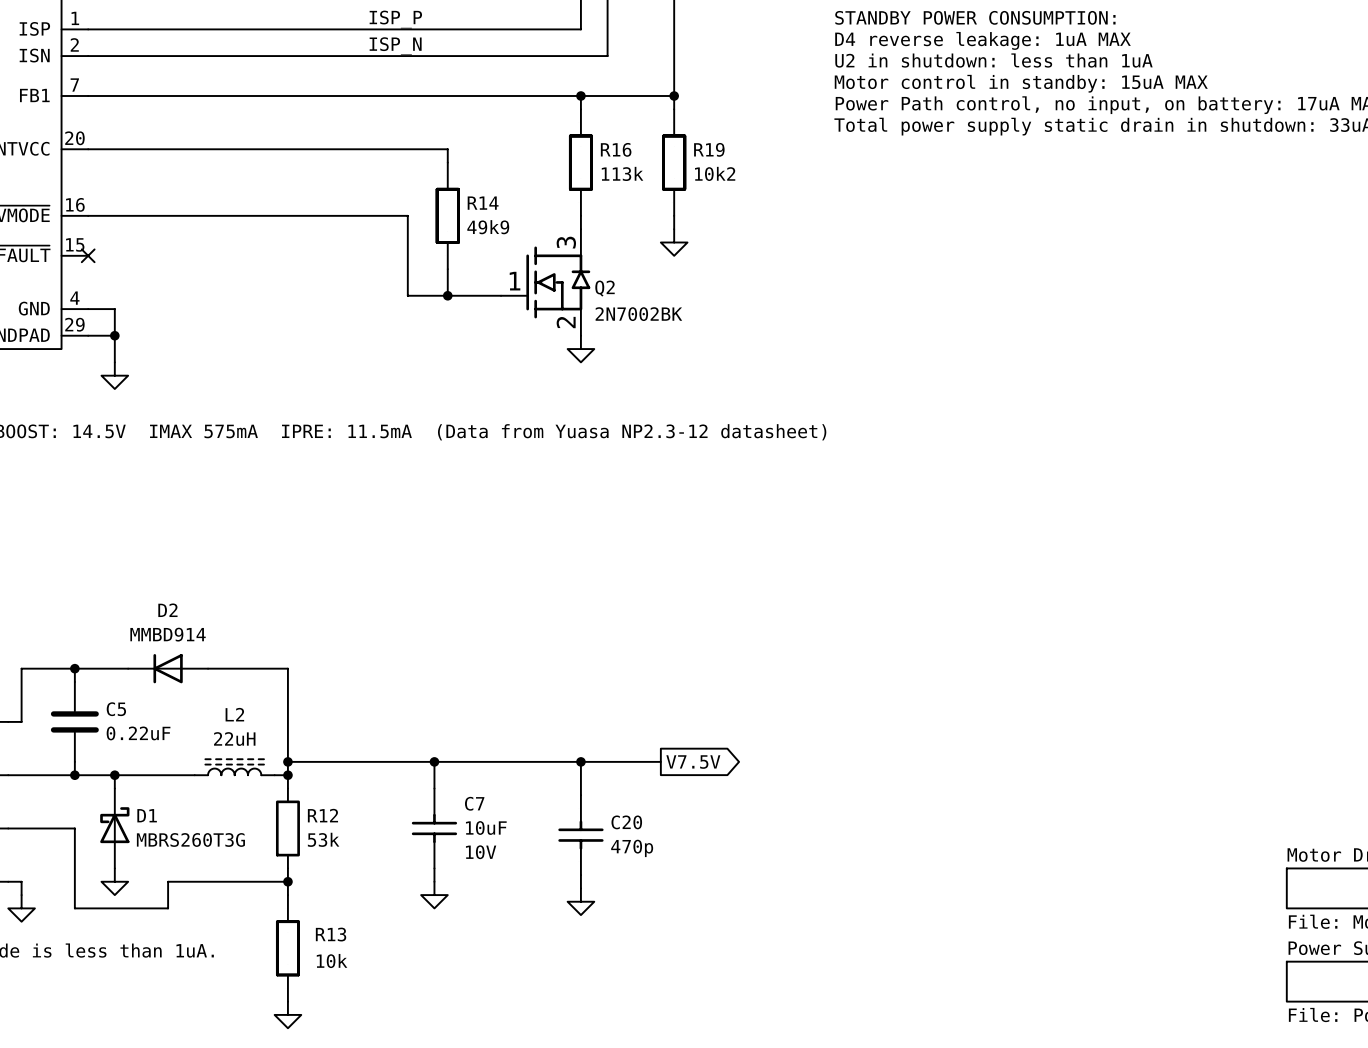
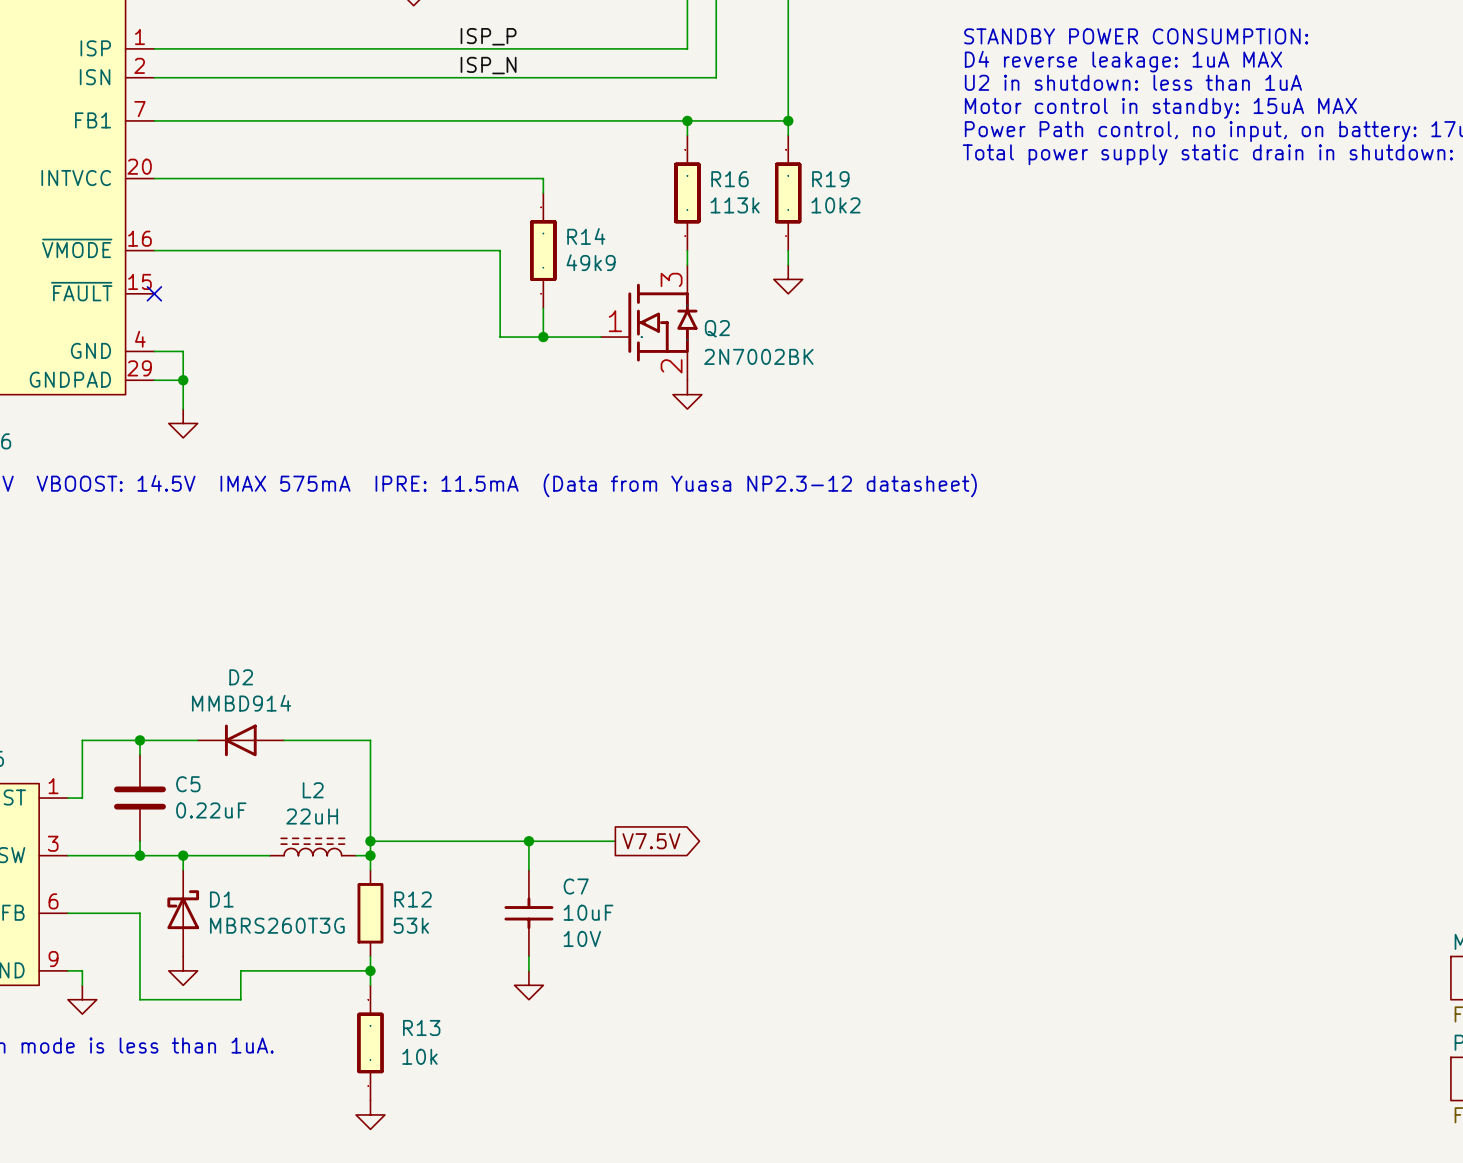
wire: (514, 761) (660, 761) -> none
wire: (580, 761) (580, 795) -> none
junction: (580, 761) -> none
global label position: V7.5V (693, 762) -> V7.5V (651, 841)
C20: (580, 835) -> none
wire: (580, 875) (580, 888) -> none
power symbol: (580, 901) -> none

